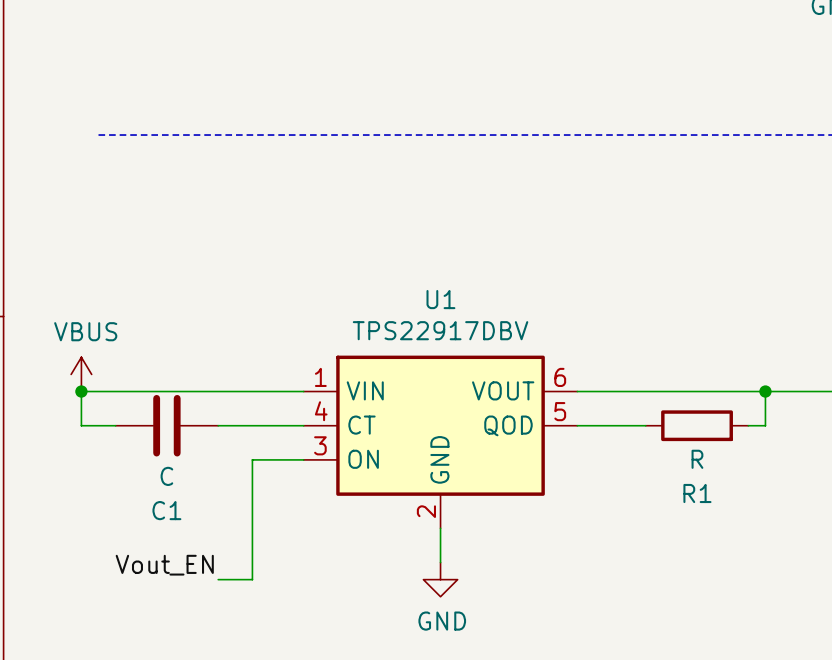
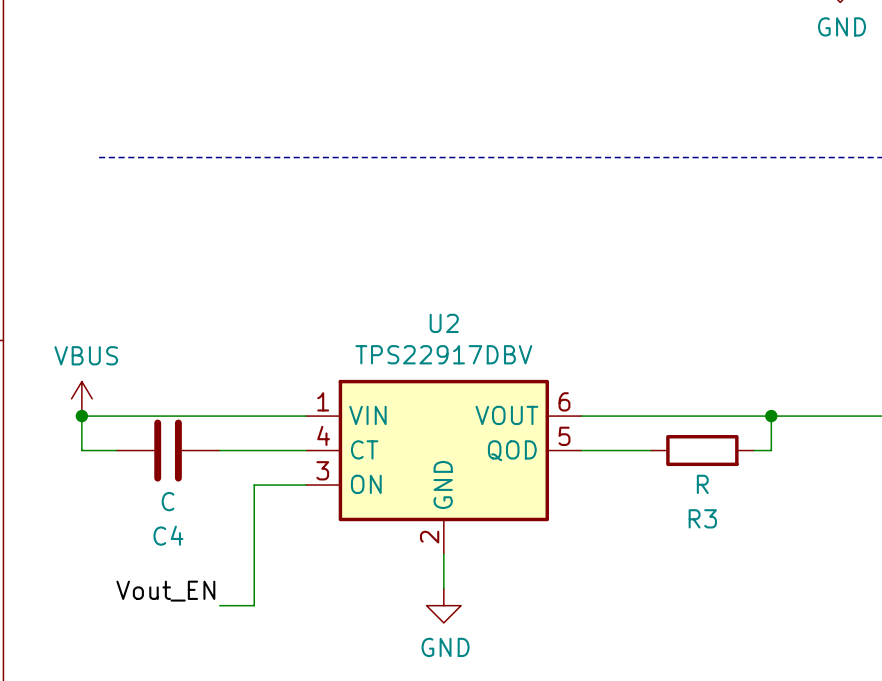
U1 name: U1 (440, 299) -> U2 (444, 323)
R1 name: R1 (697, 493) -> R3 (702, 518)
C1 name: C1 (166, 510) -> C4 (168, 535)

